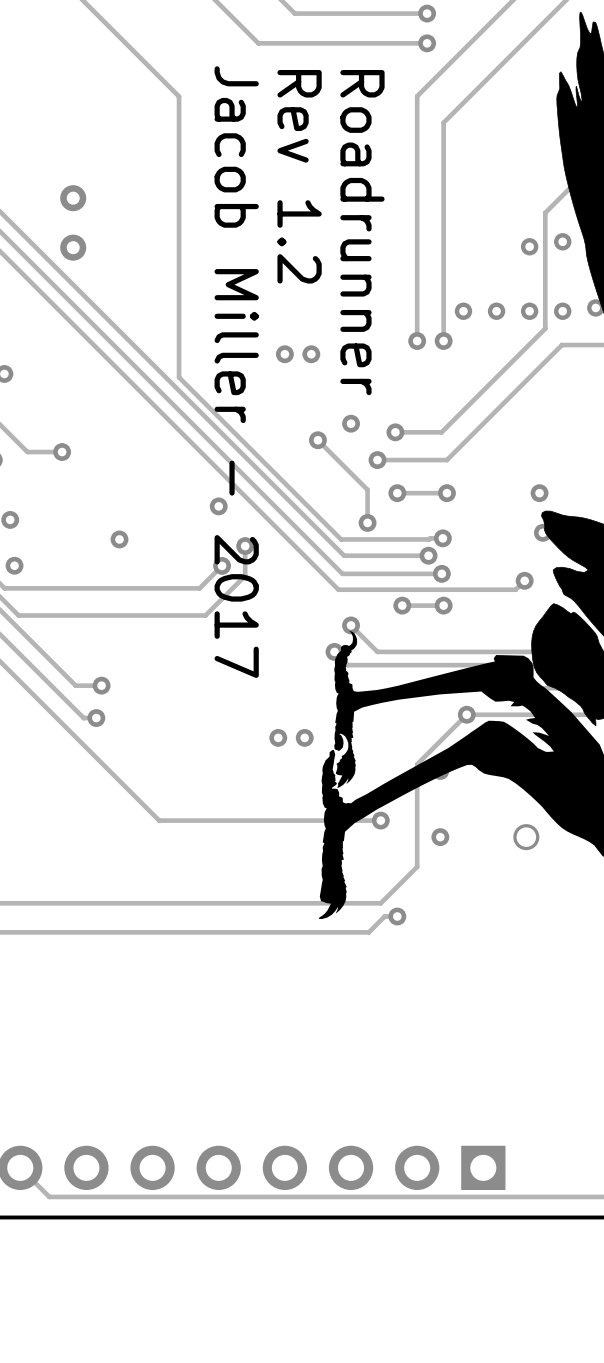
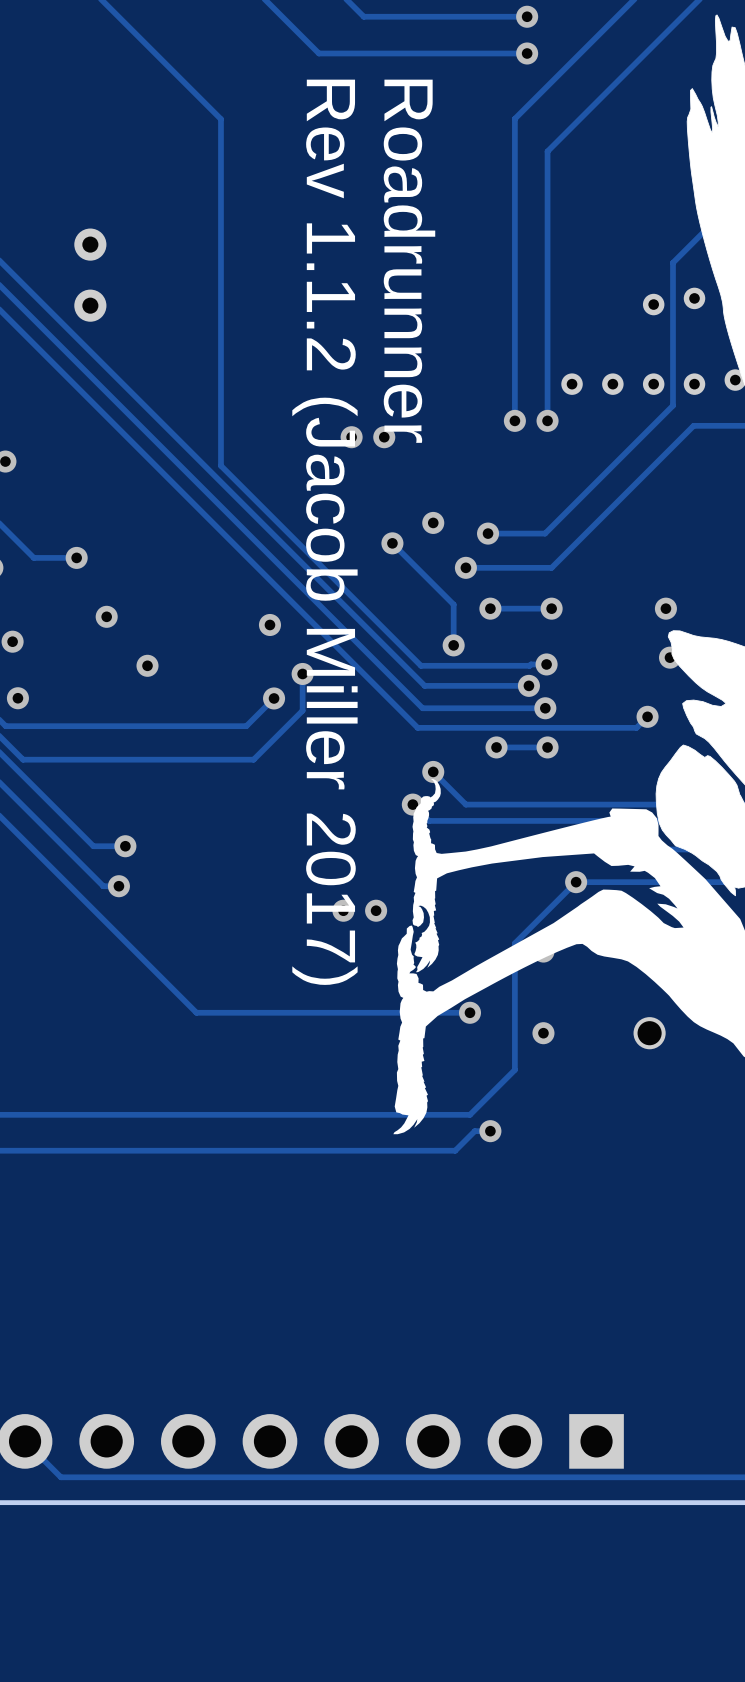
text: Rev 1.2 (299, 176) -> none
text position: Roadrunner (362, 232) -> Roadrunner (409, 261)
text: Jacob Miller - 2017 (236, 372) -> Rev 1.1.2 (Jacob Miller 2017) (324, 532)
via: none -> (106, 616)

